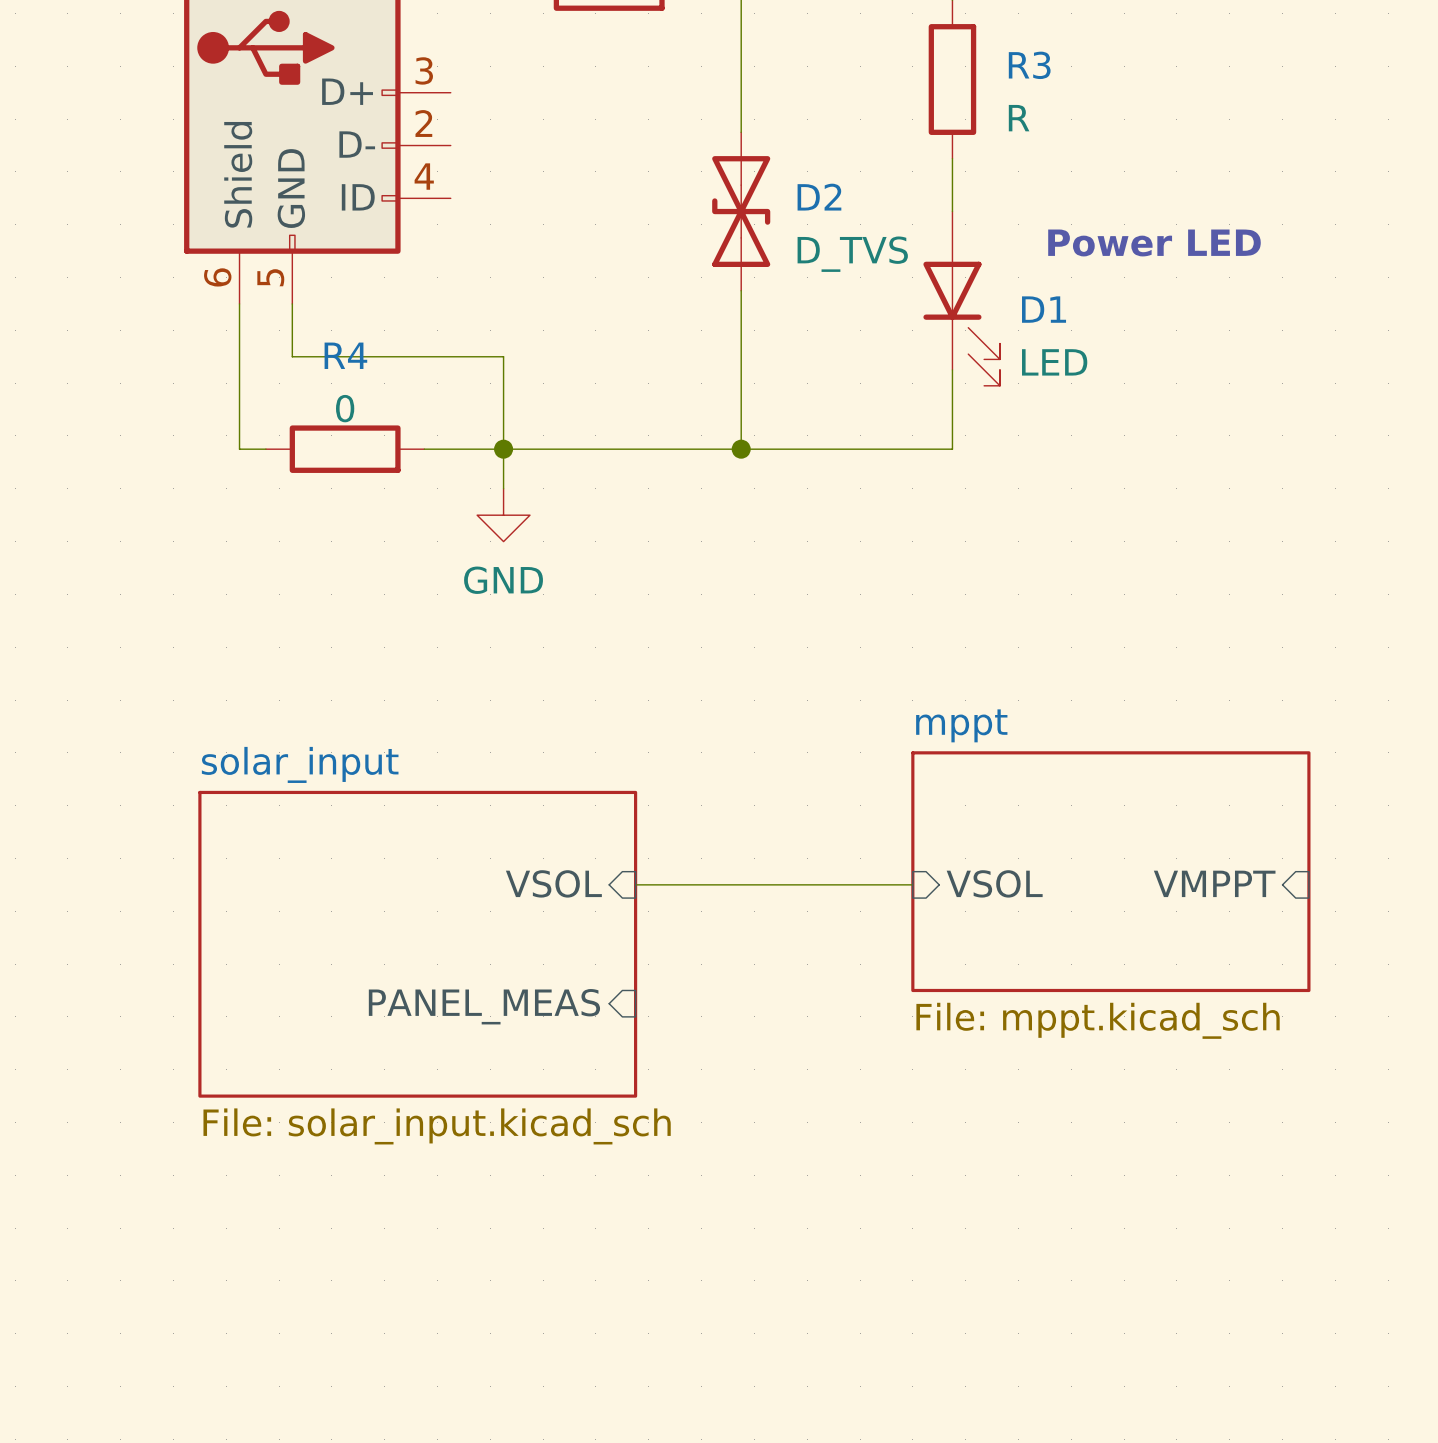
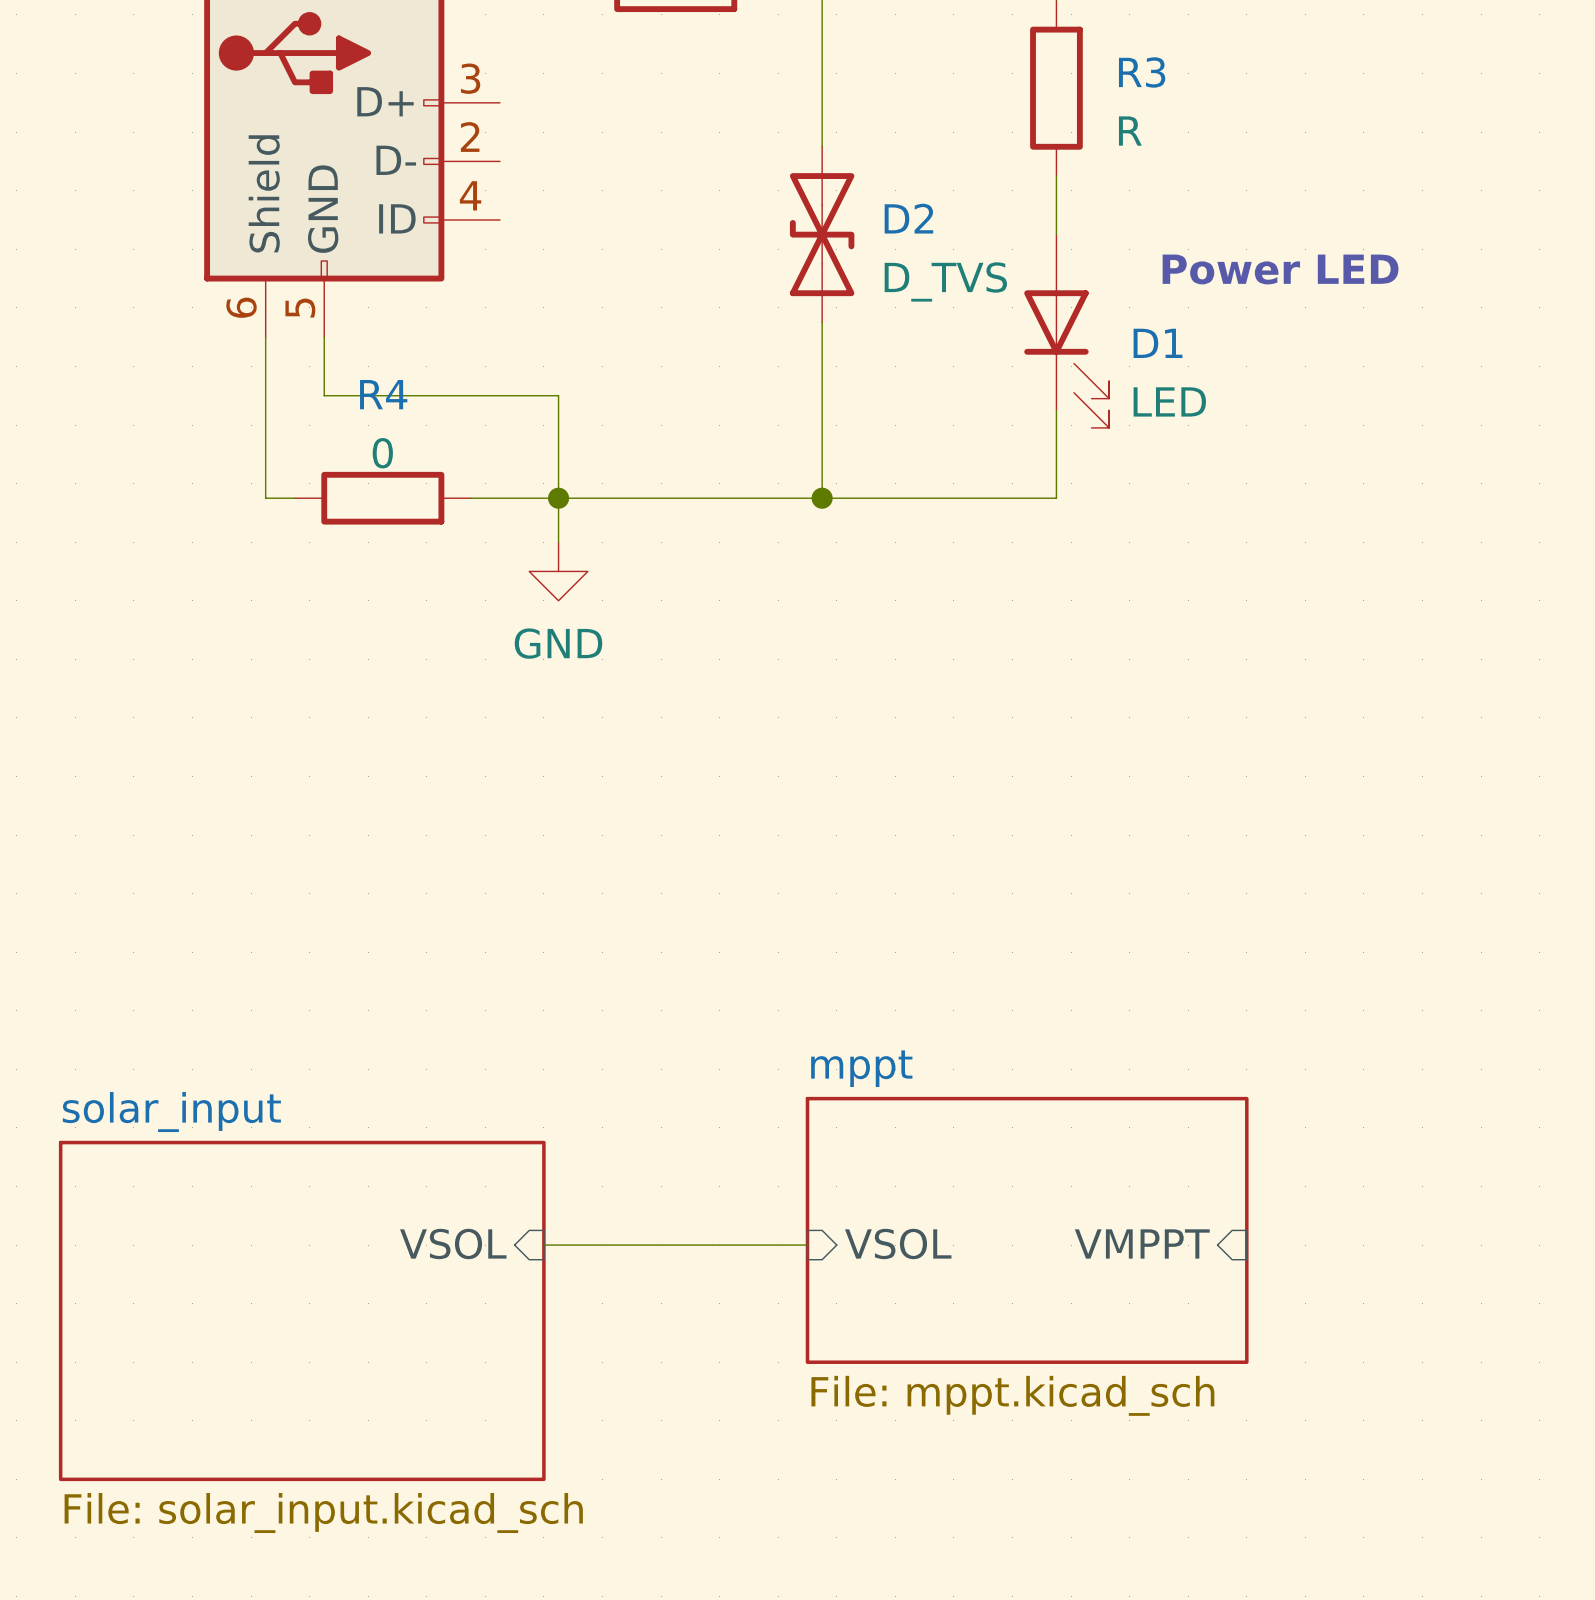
sheet mppt position: (1110, 871) -> (1027, 1230)
sheet pin: VSOL (553, 883) -> none
sheet pin: VSOL (994, 883) -> none
sheet pin position: VMPPT (1214, 883) -> VMPPT (1142, 1243)
wire: (635, 884) (912, 884) -> none
sheet solar_input position: (417, 944) -> (302, 1310)
sheet pin: PANEL_MEAS (484, 1006) -> none
sheet pin: none -> VSOL (453, 1243)
sheet pin: none -> VSOL (898, 1243)
wire: none -> (543, 1245) (807, 1245)

